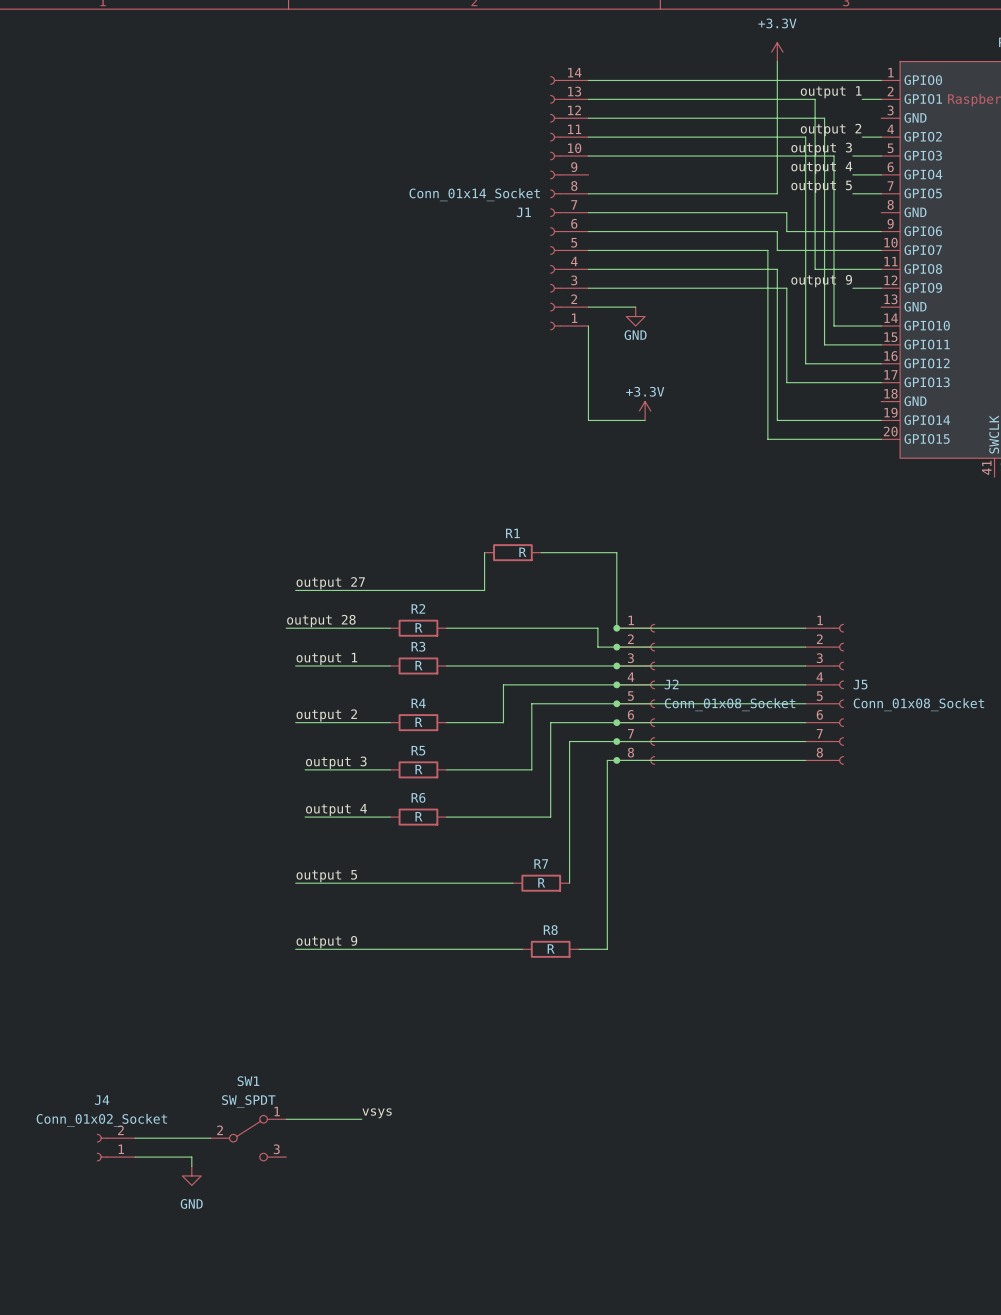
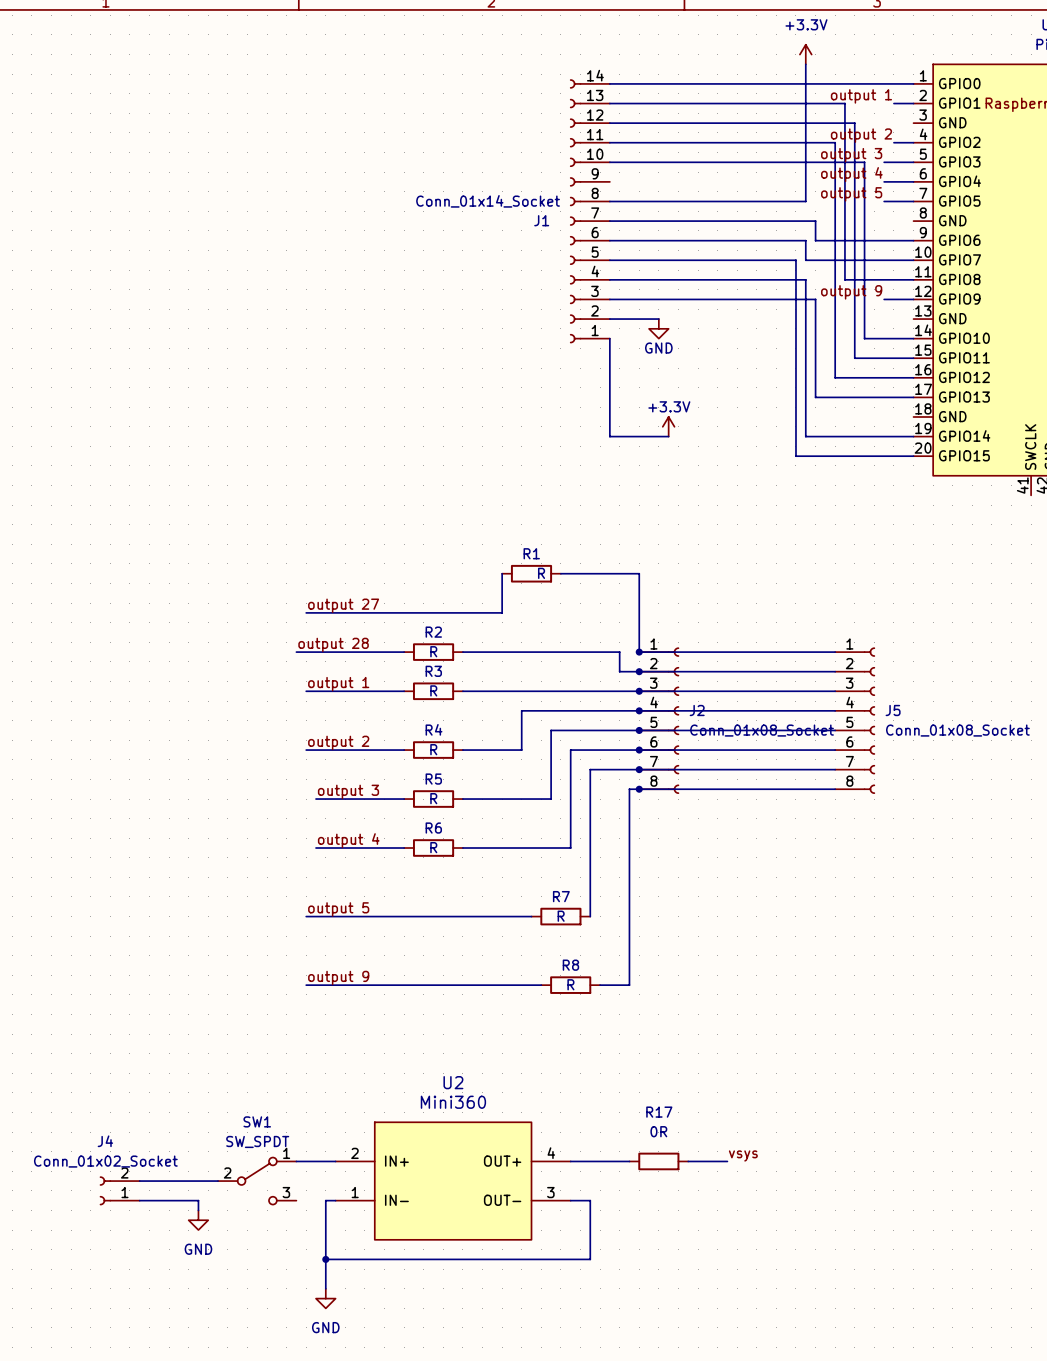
label: vsys (377, 1113) -> none
label: none -> vsys (743, 1155)
wire: none -> (570, 1161) (629, 1161)
R17: none -> 0R (658, 1161)
wire: none -> (688, 1161) (727, 1161)
U2: none -> Mini360 (453, 1181)
wire: none -> (335, 1200) (325, 1200) (325, 1288)
wire: none -> (570, 1200) (590, 1200) (590, 1259) (325, 1259)
junction: none -> (325, 1259)
power symbol: none -> GND (325, 1298)

